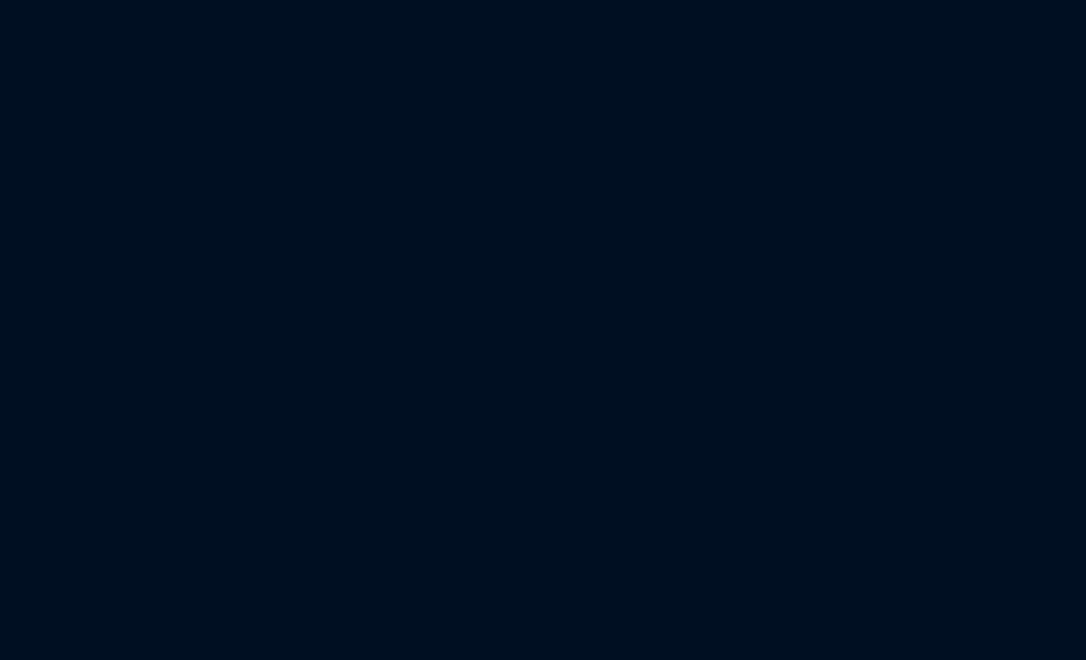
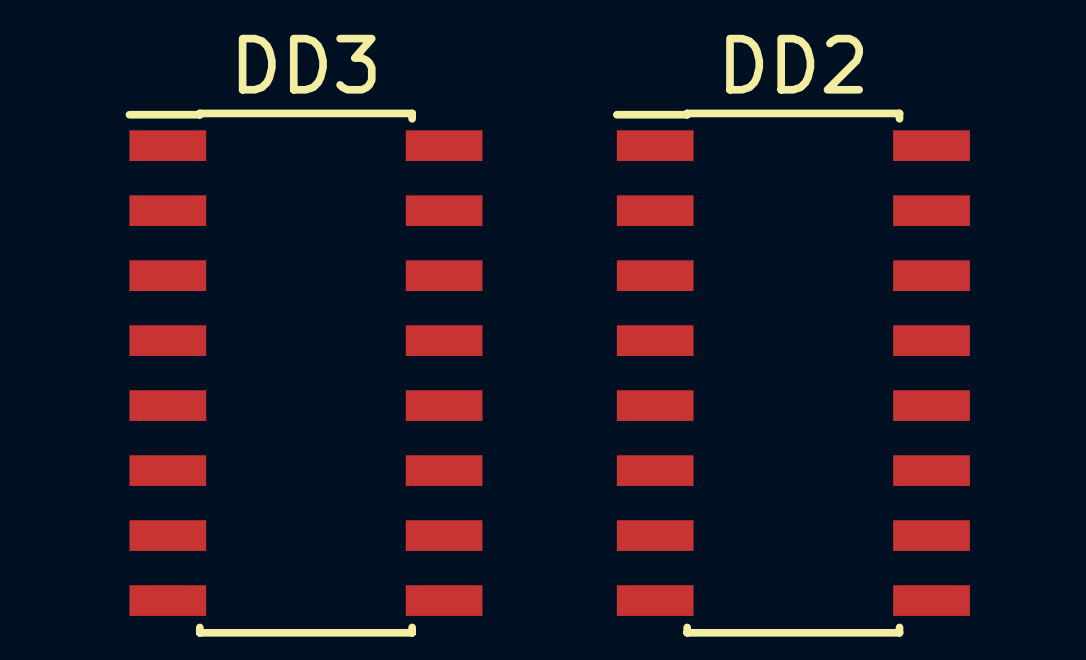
DD3: none -> (304, 373)
DD2: none -> (791, 373)

